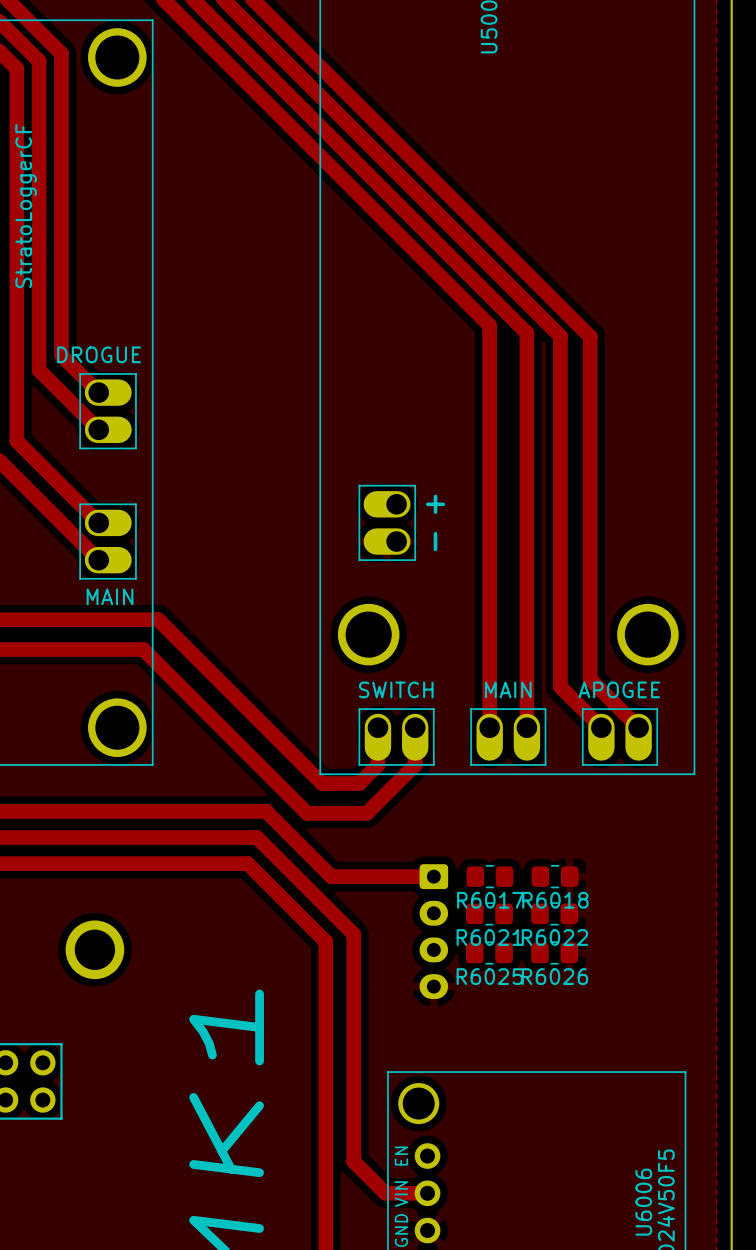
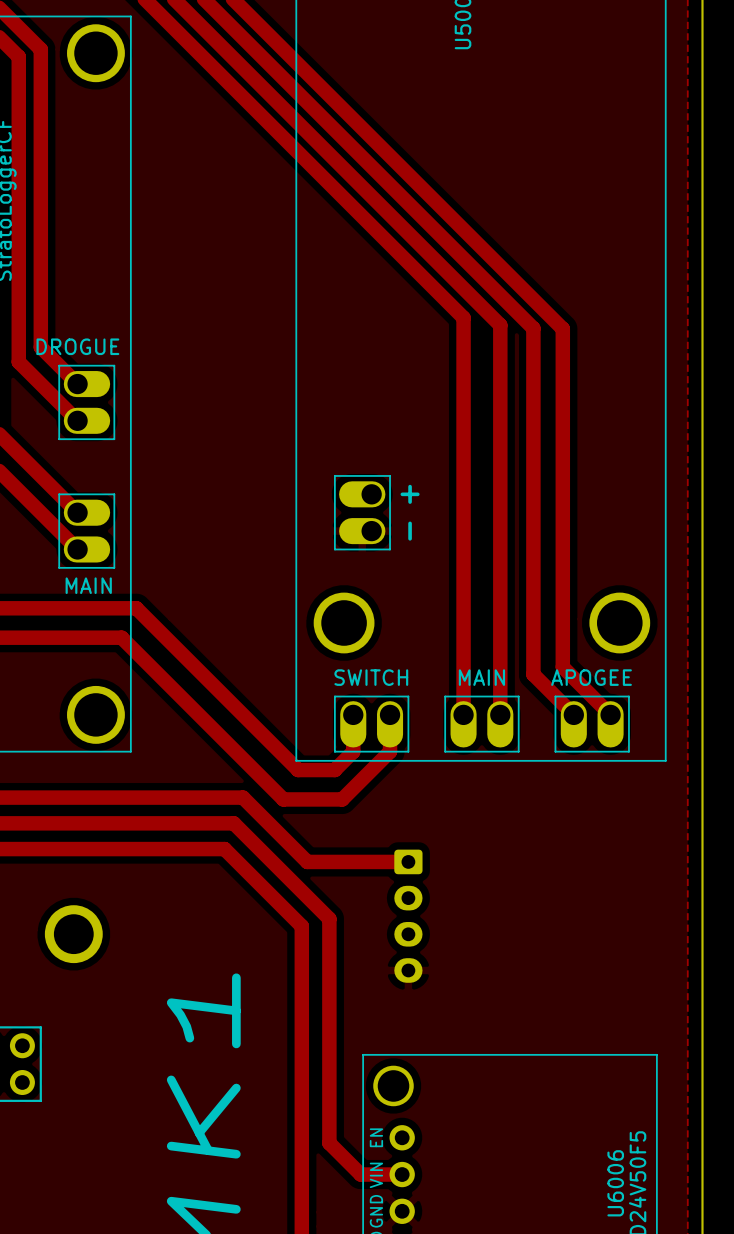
R6017: (489, 876) -> none
R6018: (555, 876) -> none
R6021: (489, 913) -> none
R6022: (554, 913) -> none
R6025: (489, 952) -> none
R6026: (554, 952) -> none

